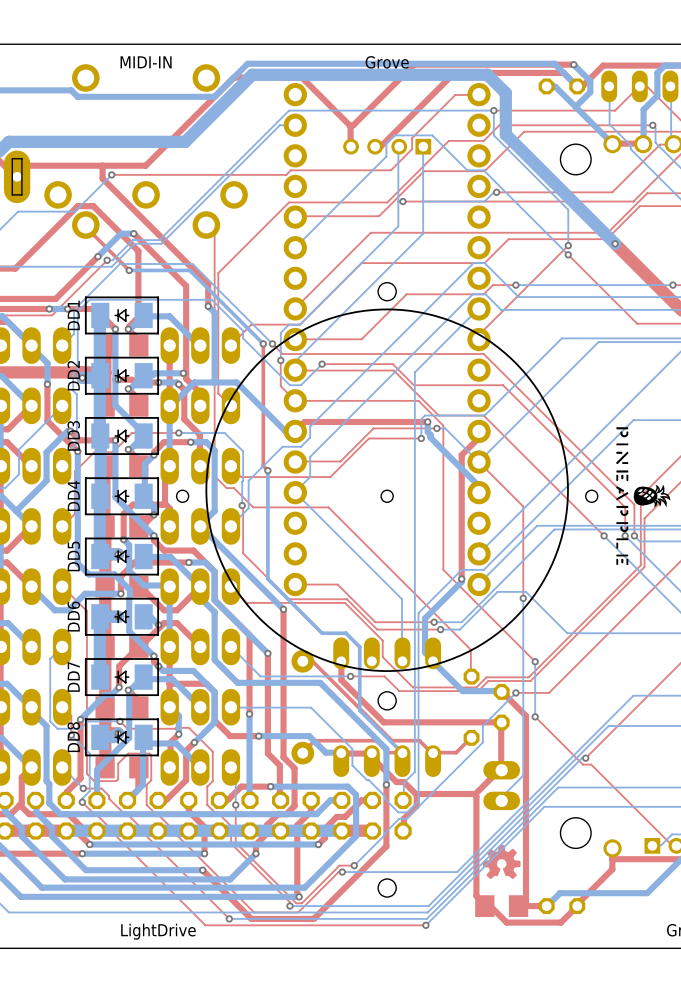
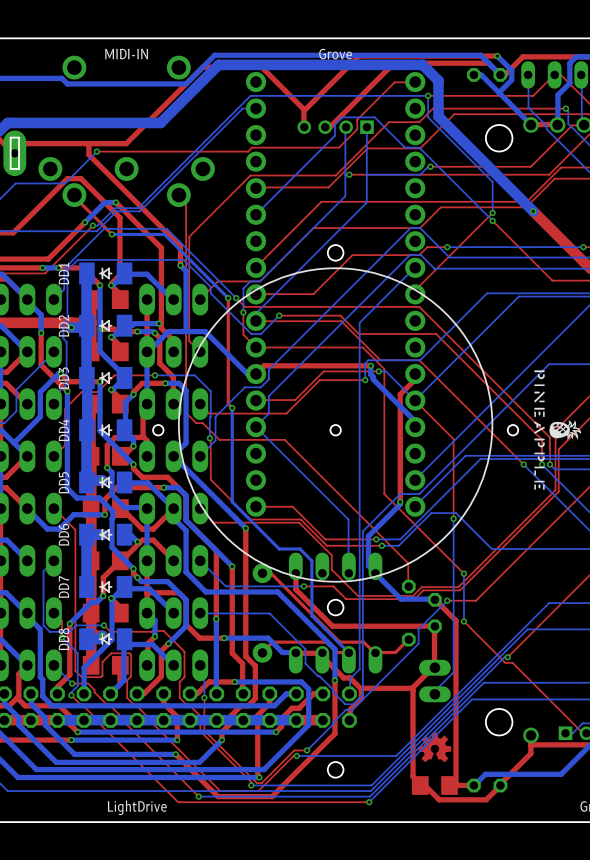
line: (158, 297) (85, 297) (85, 333) (158, 333) (158, 297) -> none
line: (158, 357) (158, 393) (85, 393) (85, 357) (158, 357) -> none
line: (158, 417) (158, 454) (85, 454) (85, 417) (158, 417) -> none
line: (158, 478) (158, 514) (85, 514) (85, 478) (158, 478) -> none
line: (158, 538) (158, 574) (85, 574) (85, 538) (158, 538) -> none
line: (158, 598) (158, 634) (85, 634) (85, 598) (158, 598) -> none
line: (158, 659) (158, 695) (85, 695) (85, 659) (158, 659) -> none
line: (158, 719) (158, 755) (85, 755) (85, 719) (158, 719) -> none

